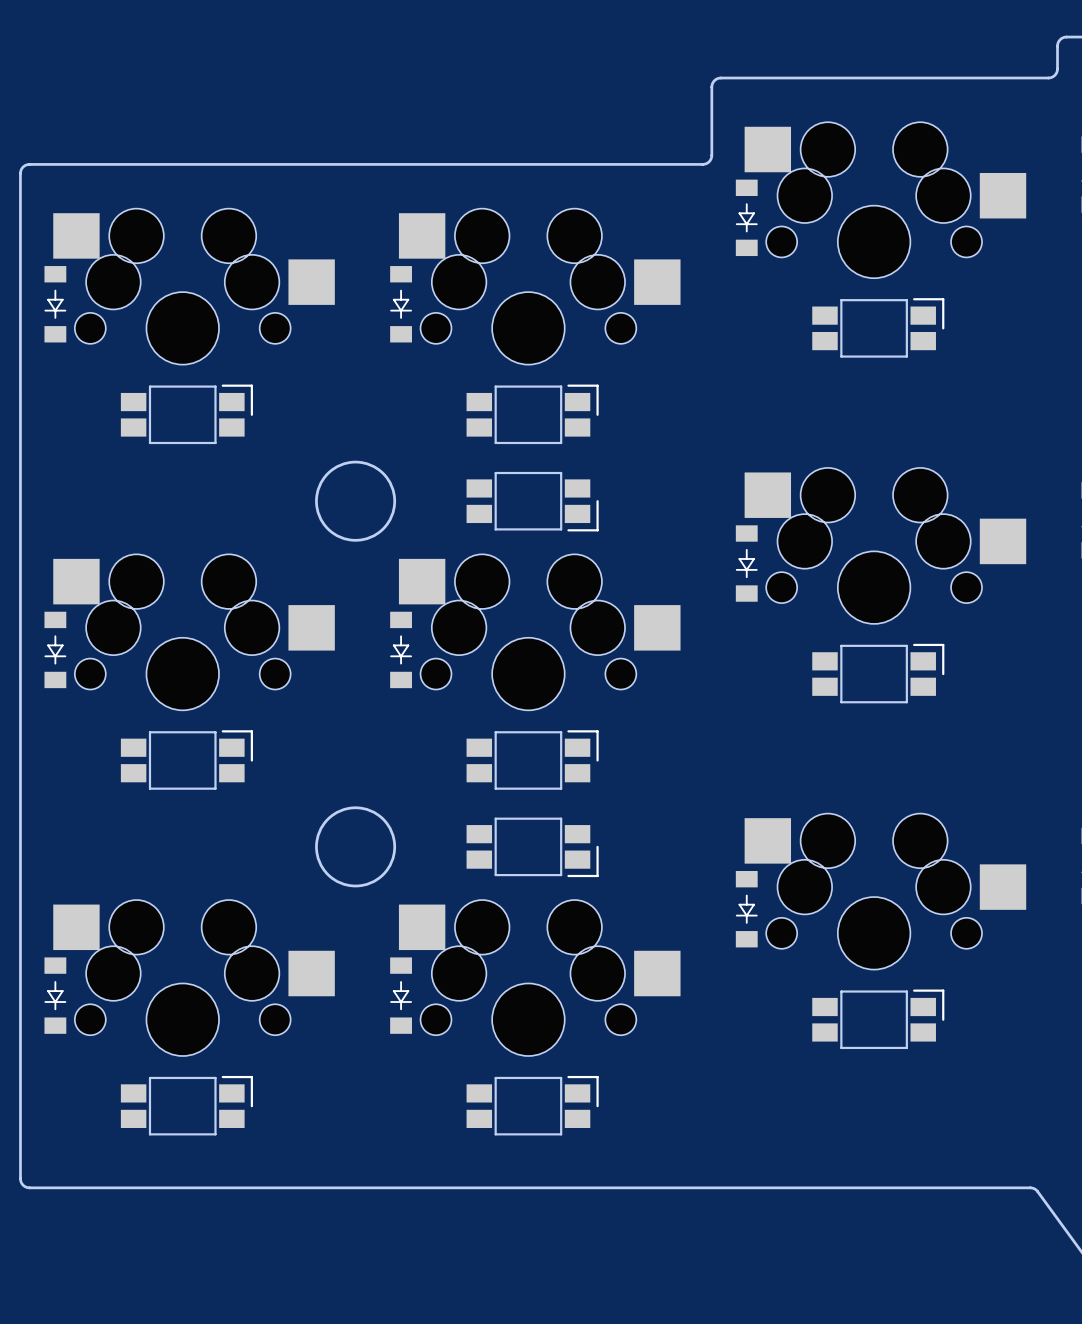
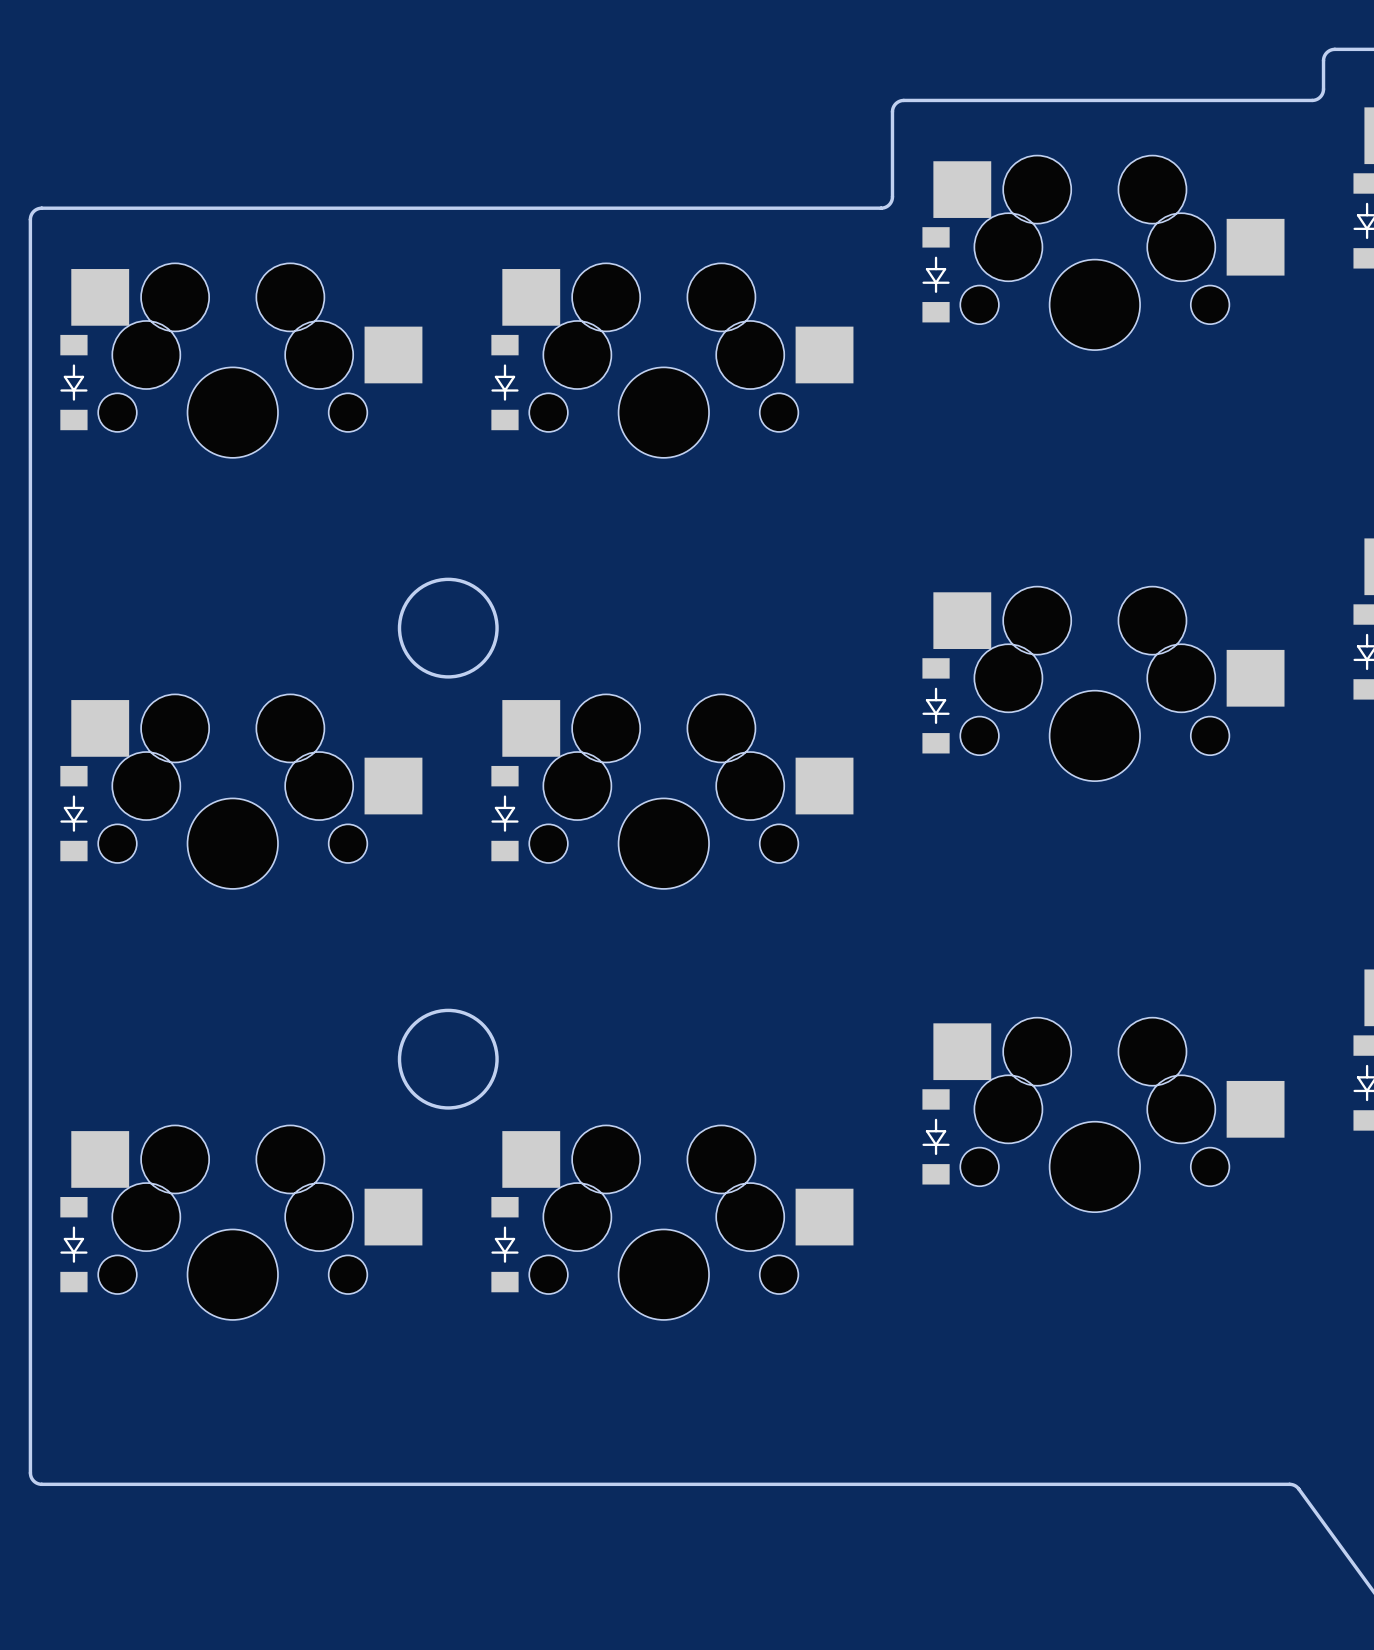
part: (878, 327) -> none
part: (186, 414) -> none
part: (532, 414) -> none
part: (532, 501) -> none
part: (878, 673) -> none
part: (186, 760) -> none
part: (532, 760) -> none
part: (532, 847) -> none
part: (878, 1019) -> none
part: (186, 1105) -> none
part: (532, 1105) -> none

